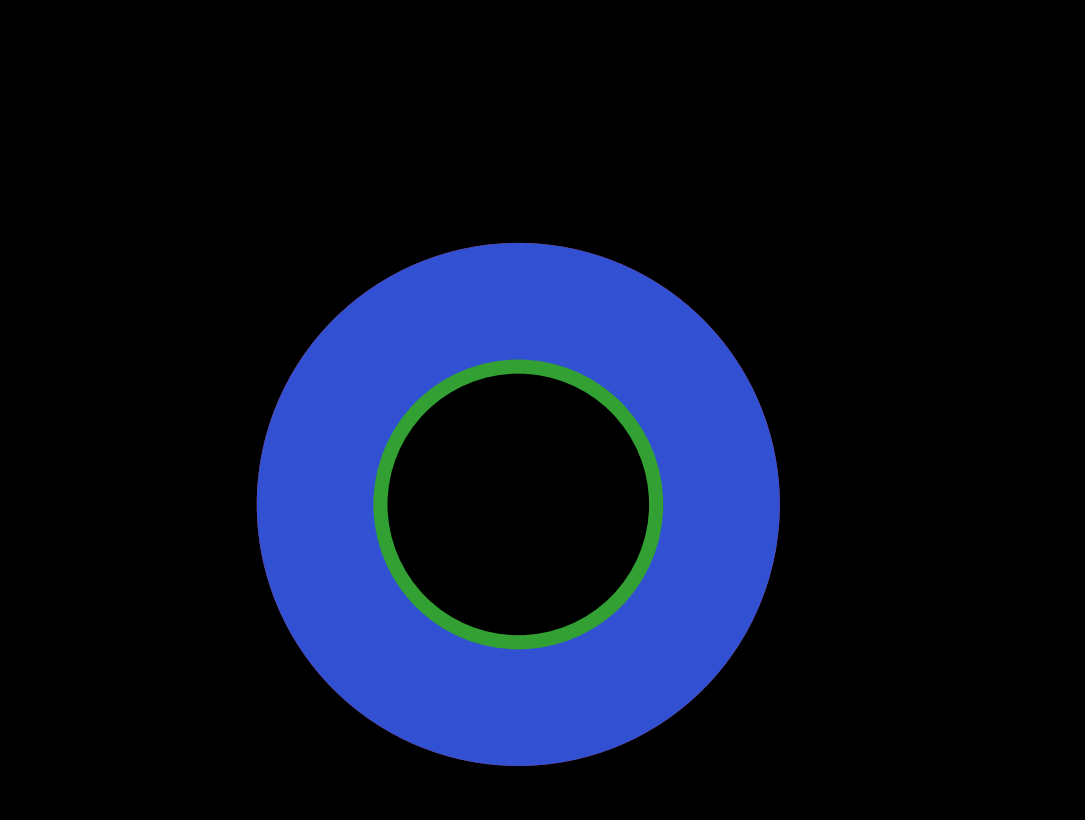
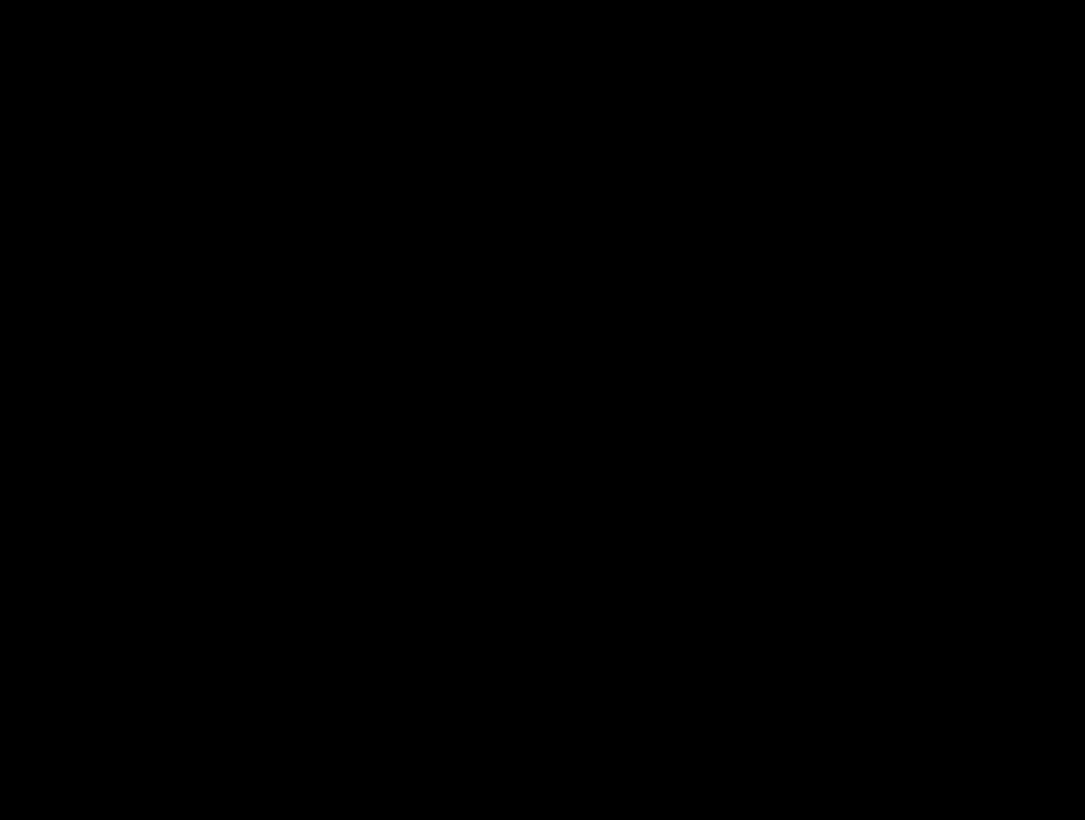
part: (518, 504) -> none

